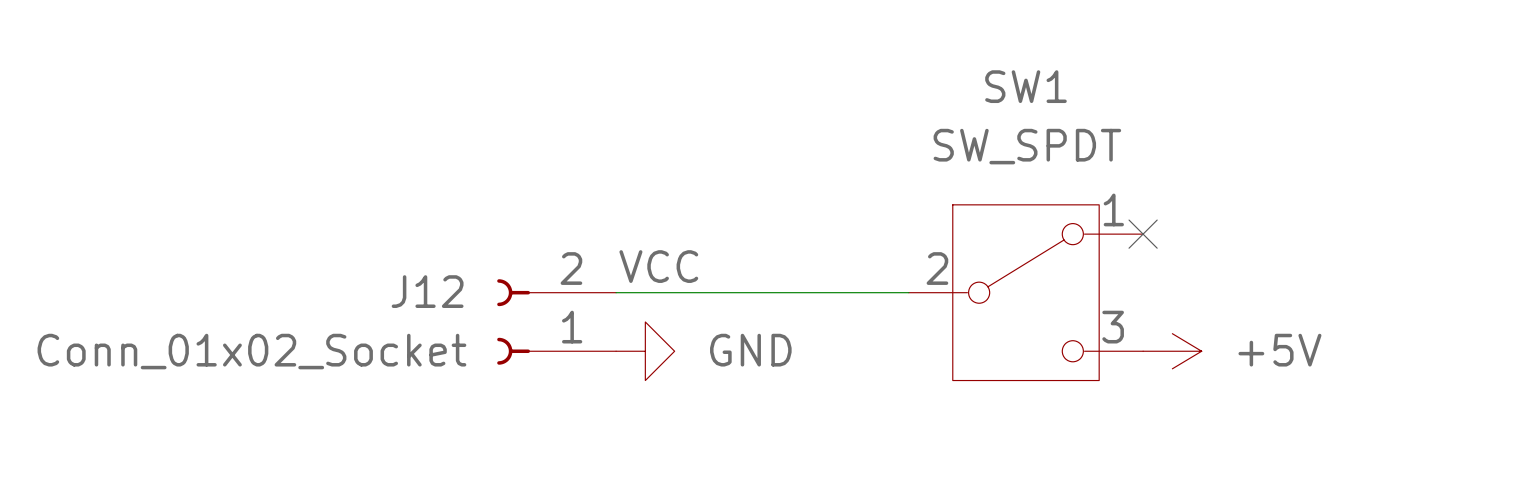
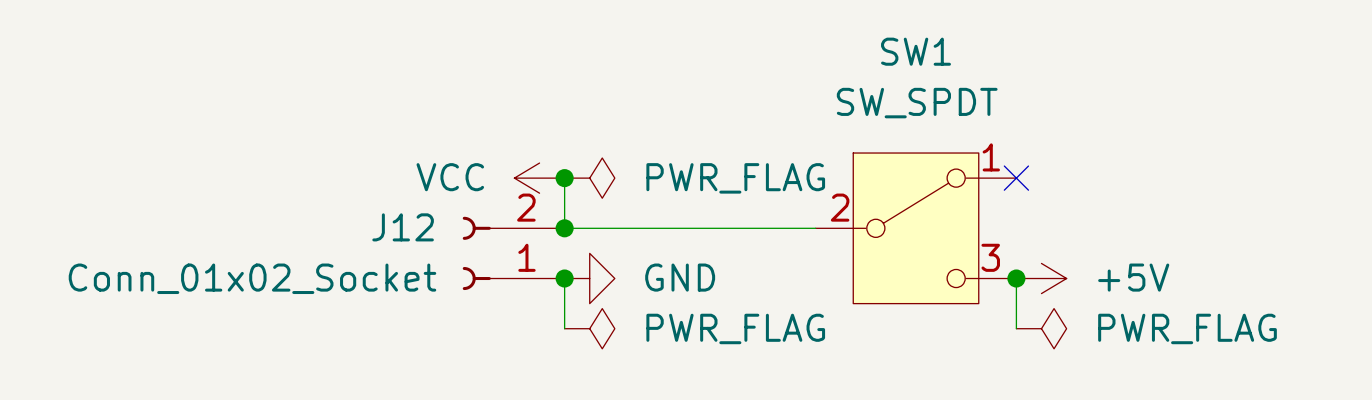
power symbol: none -> VCC (539, 178)
wire: none -> (564, 178) (564, 228)
junction: none -> (564, 178)
power symbol: none -> PWR_FLAG (589, 178)
label: VCC (658, 266) -> none
junction: none -> (564, 228)
wire: none -> (564, 278) (564, 328)
junction: none -> (564, 278)
wire: none -> (1016, 278) (1016, 328)
junction: none -> (1016, 278)
power symbol: none -> PWR_FLAG (589, 328)
power symbol: none -> PWR_FLAG (1041, 328)

